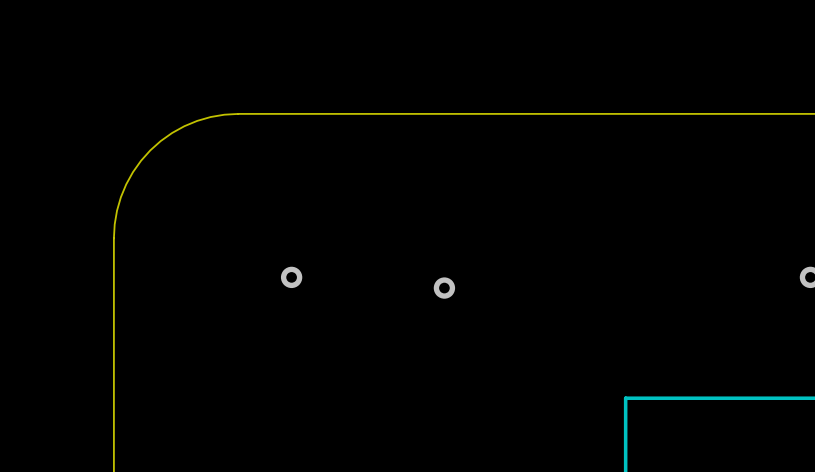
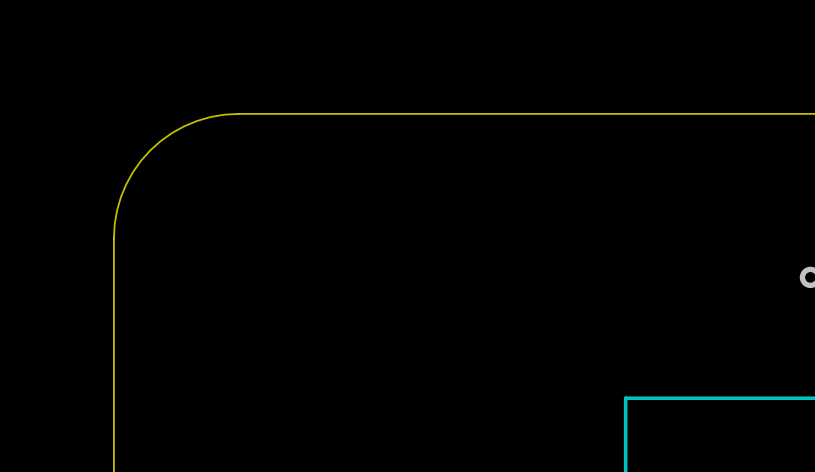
via: (291, 277) -> none
via: (444, 288) -> none

